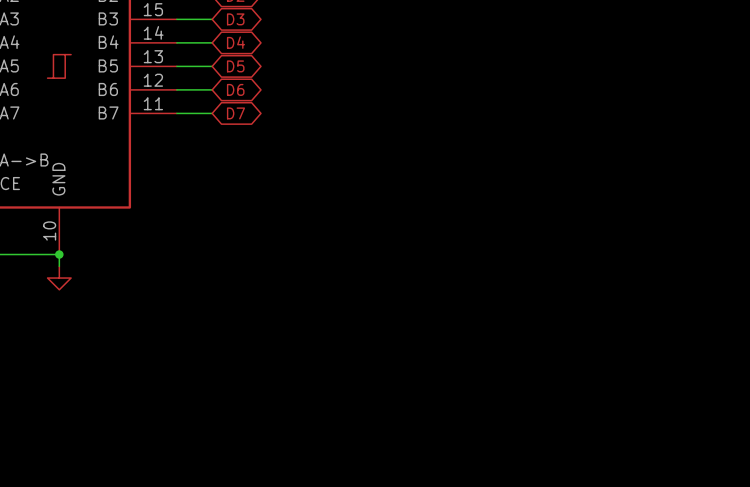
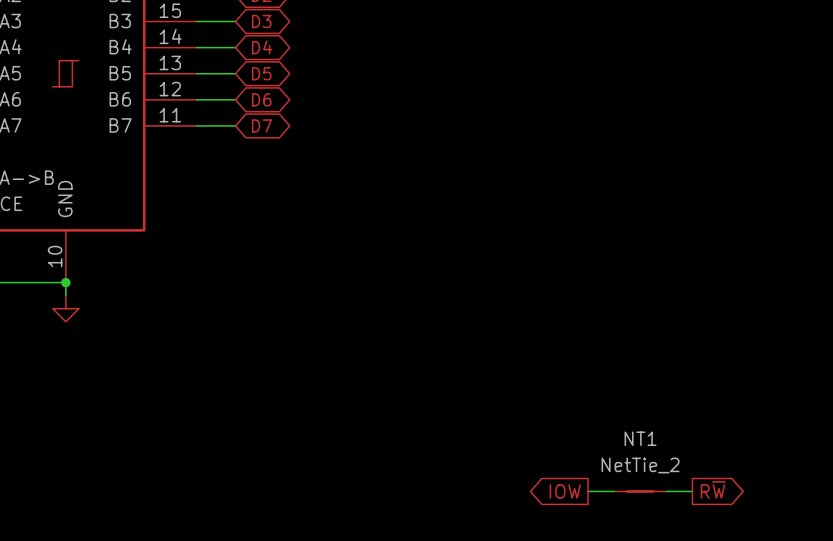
global label: none -> R~{W} (713, 489)
global label: none -> IOW (565, 491)
wire: none -> (588, 491) (614, 491)
NT1: none -> NetTie_2 (640, 491)
wire: none -> (666, 491) (692, 491)

